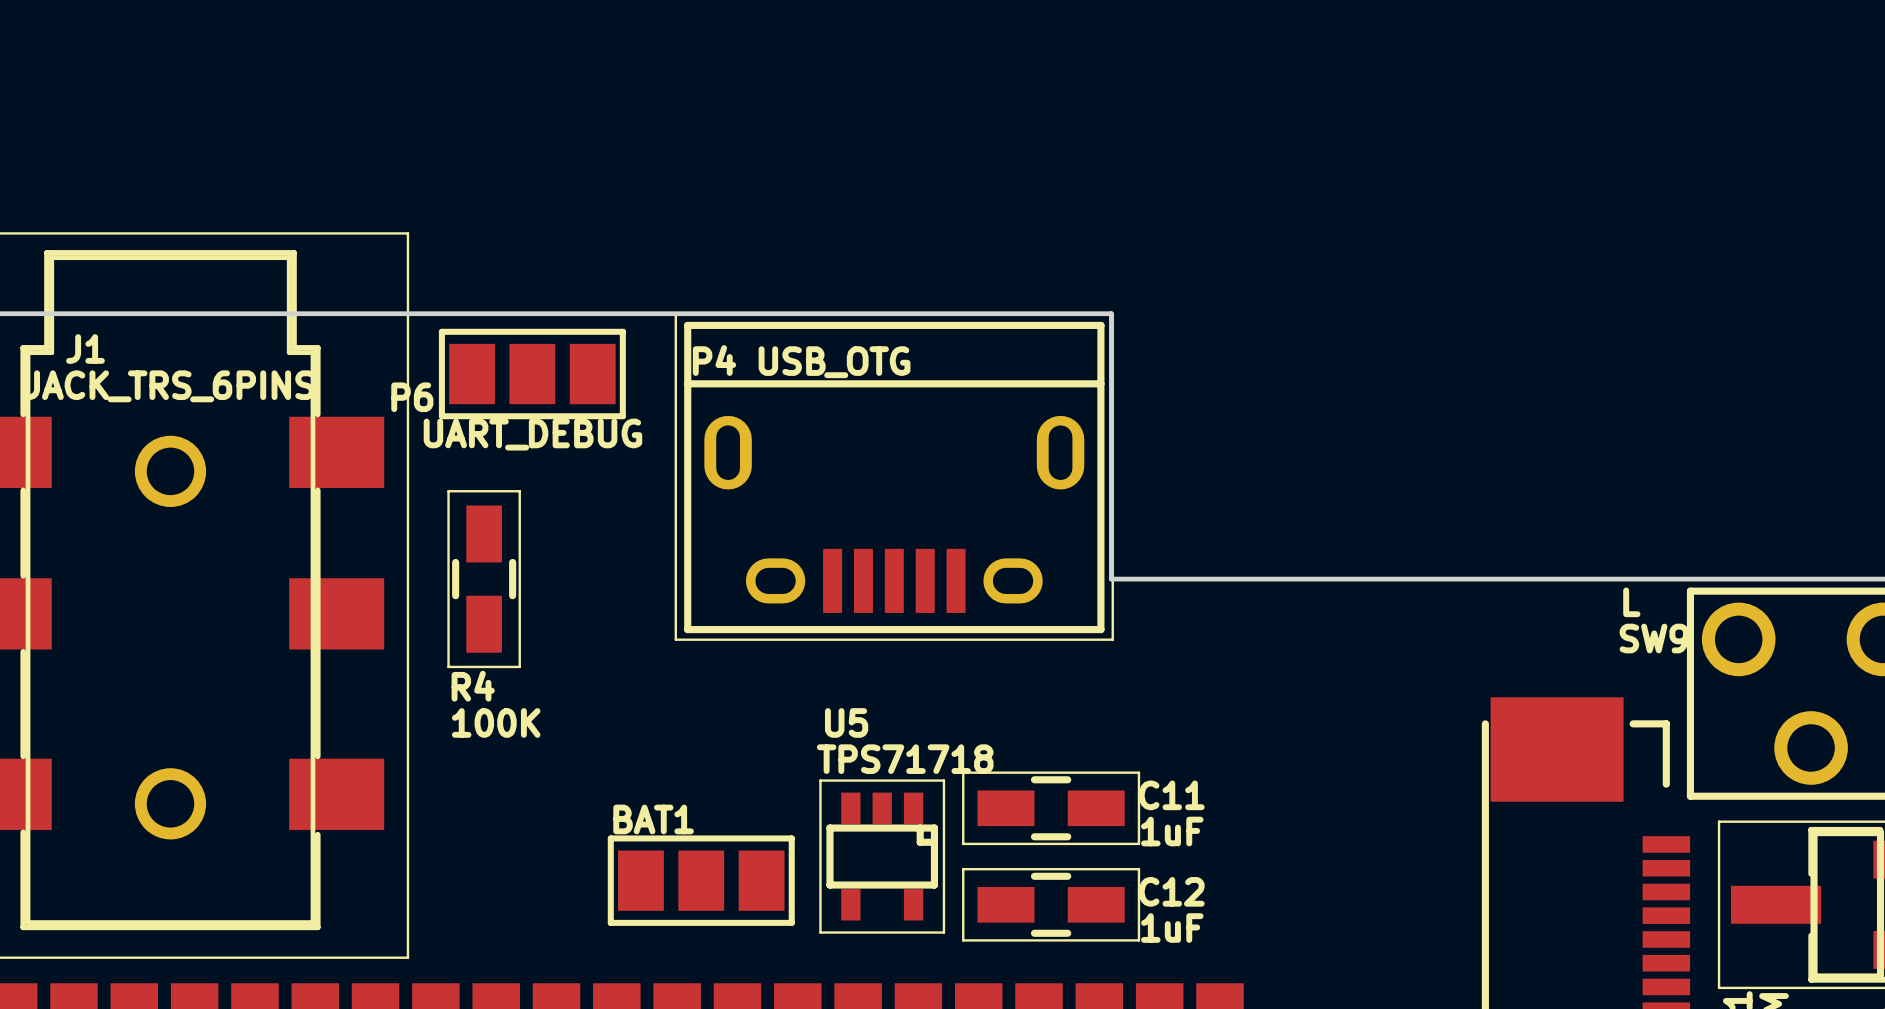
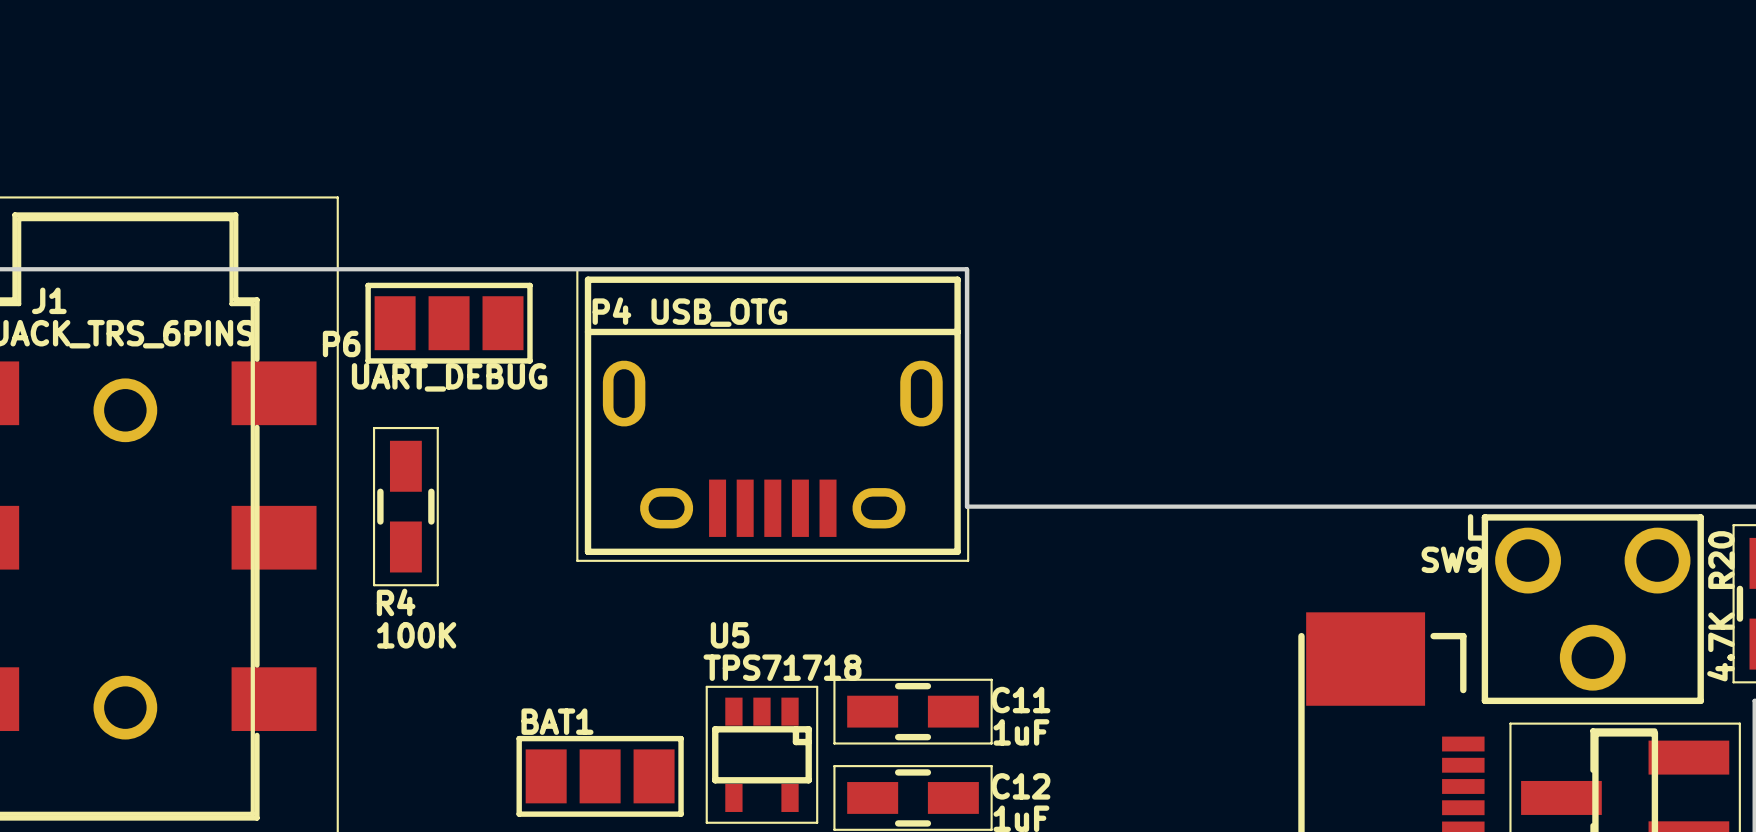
SW9 value position: L (1631, 602) -> L (1475, 527)

